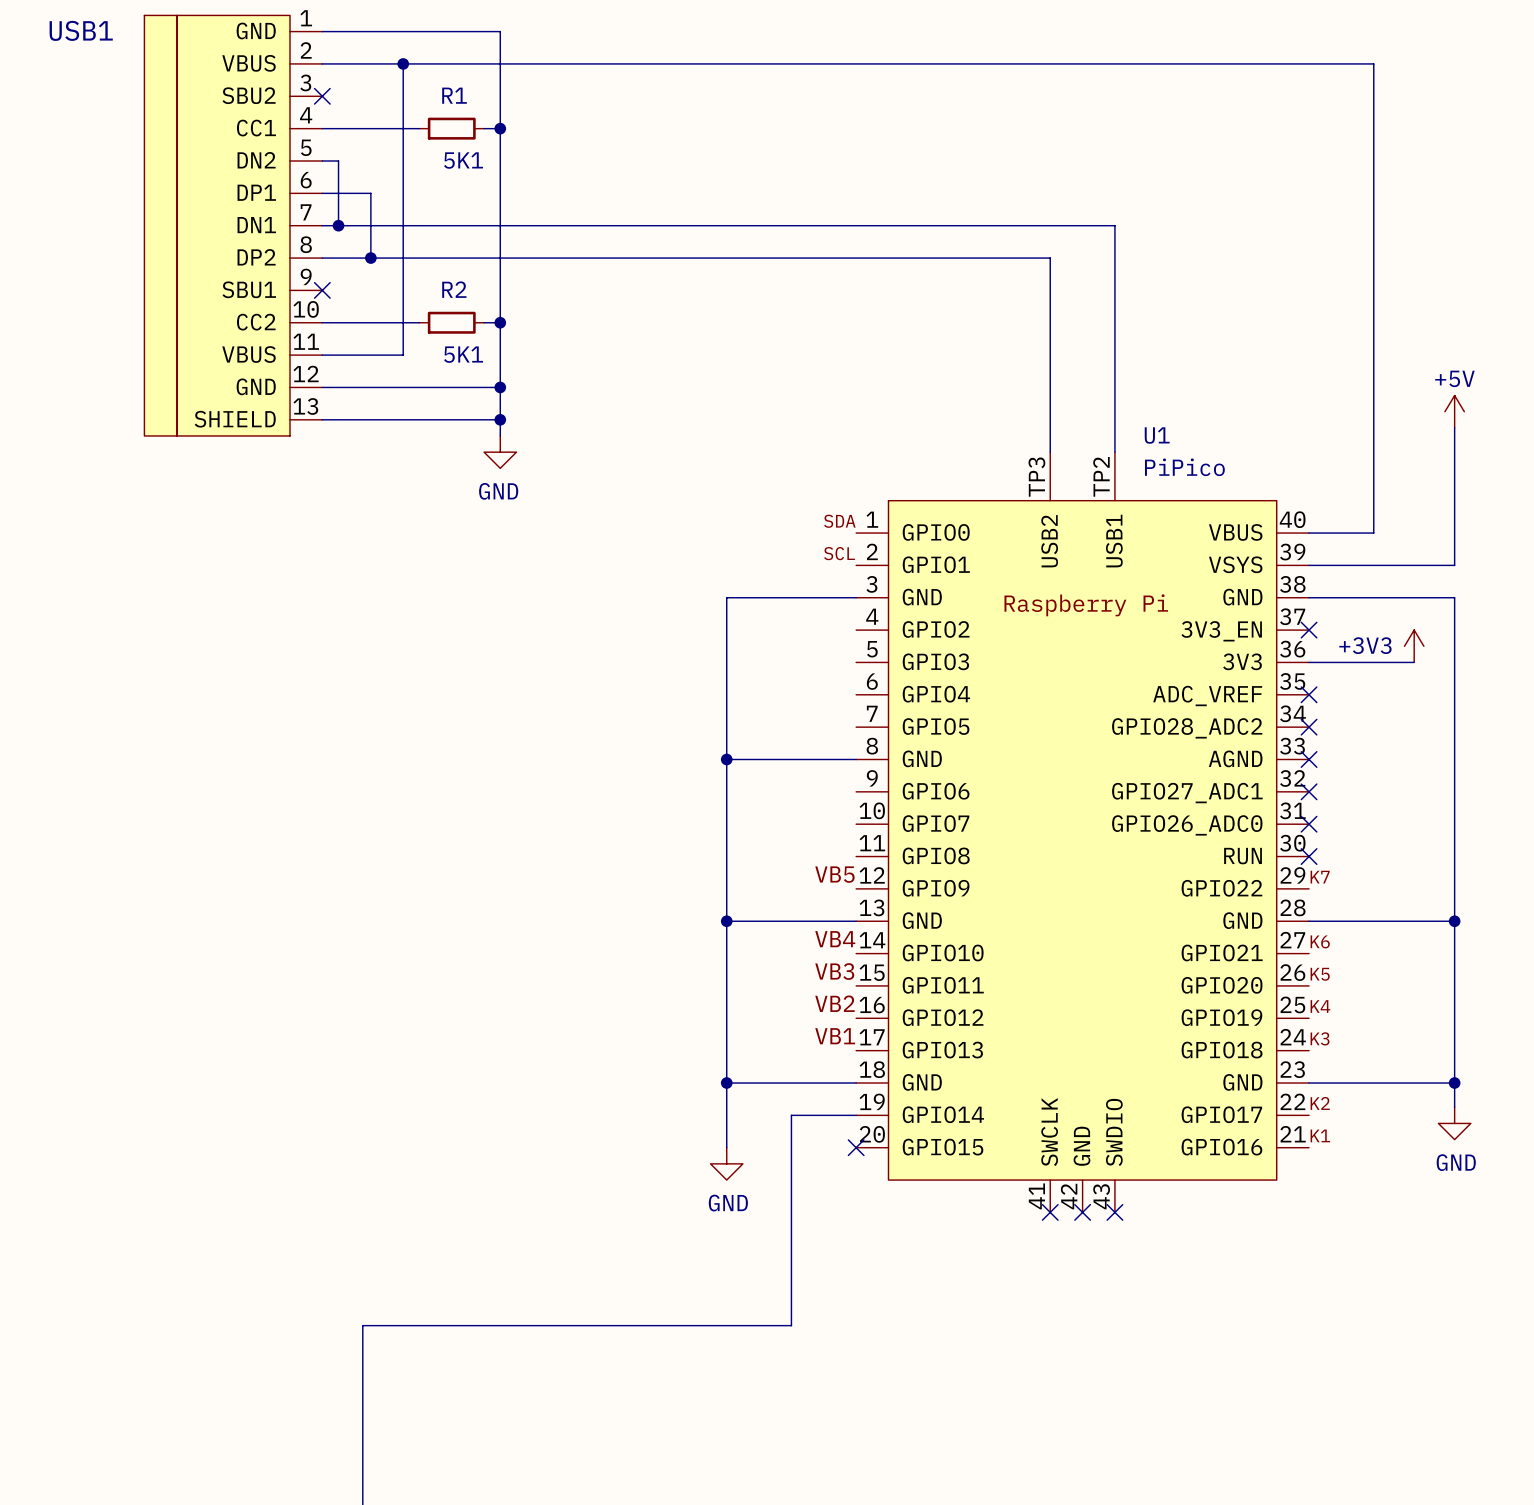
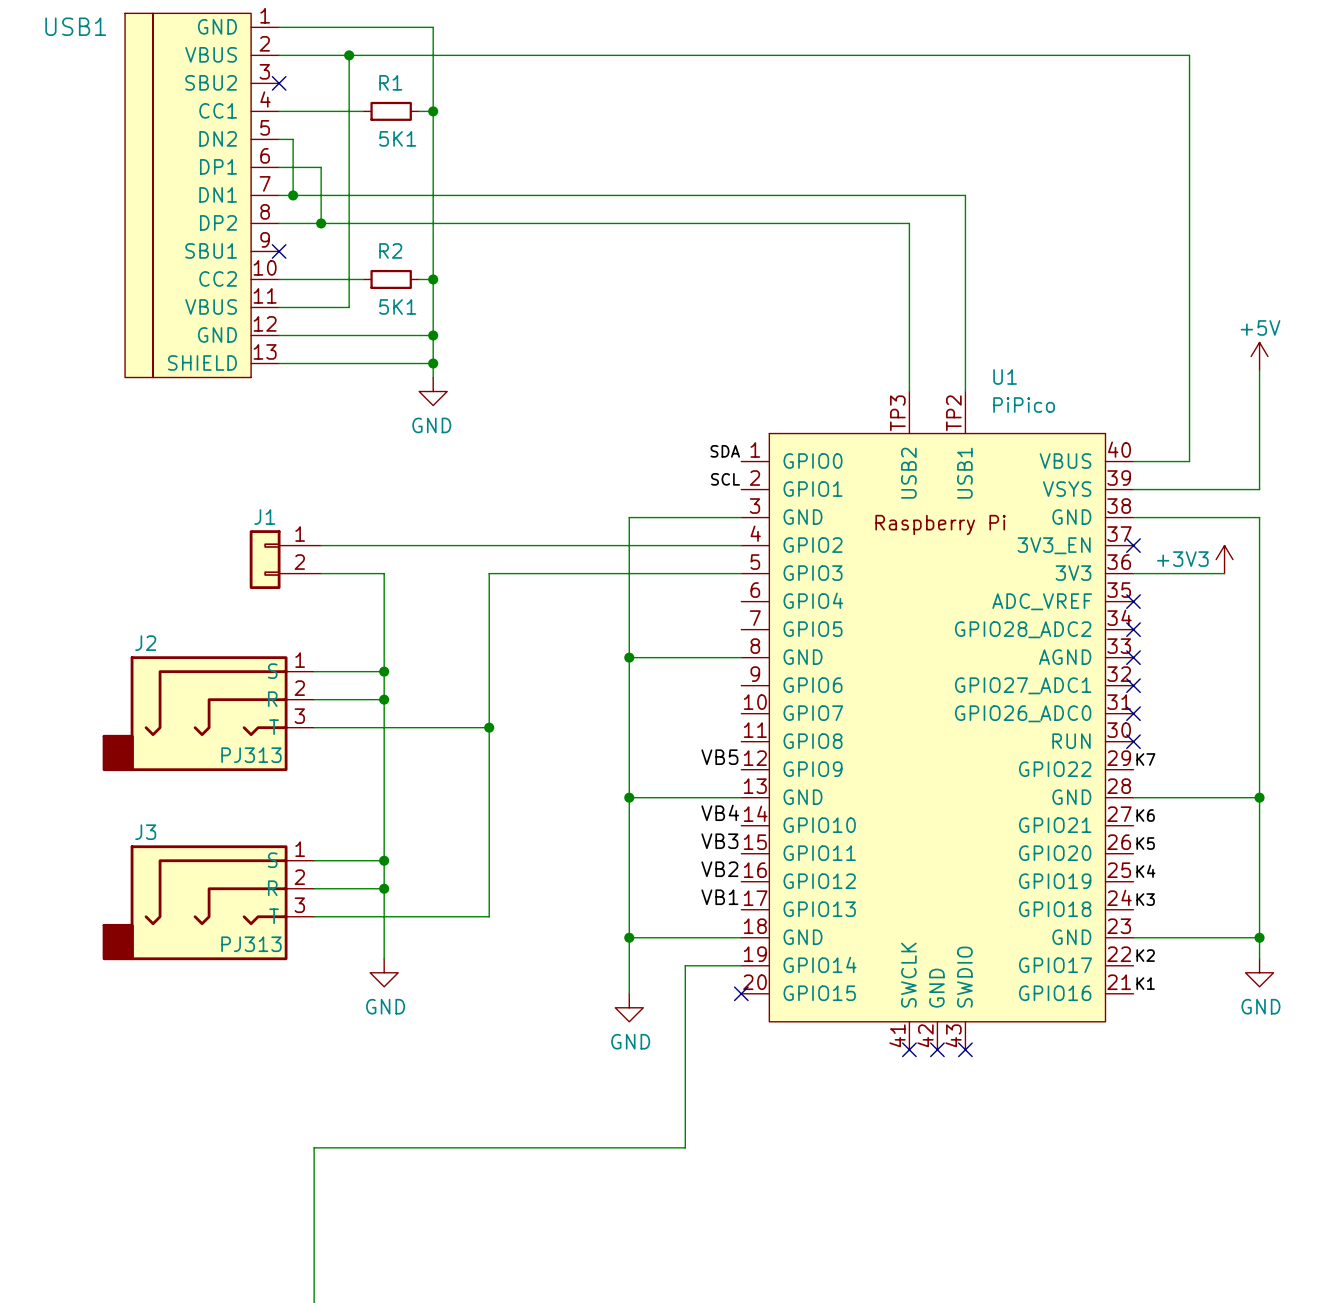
wire: none -> (321, 545) (741, 545)
J1: none -> (285, 559)
wire: none -> (321, 573) (384, 573) (384, 958)
wire: none -> (741, 573) (489, 573) (489, 916) (314, 916)
wire: none -> (314, 671) (384, 671)
junction: none -> (384, 671)
wire: none -> (314, 699) (384, 699)
junction: none -> (384, 699)
J2: none -> PJ313 (208, 713)
wire: none -> (314, 727) (489, 727)
junction: none -> (489, 727)
wire: none -> (314, 860) (384, 860)
junction: none -> (384, 860)
wire: none -> (314, 888) (384, 888)
junction: none -> (384, 888)
J3: none -> PJ313 (208, 902)
power symbol: none -> GND (384, 972)

